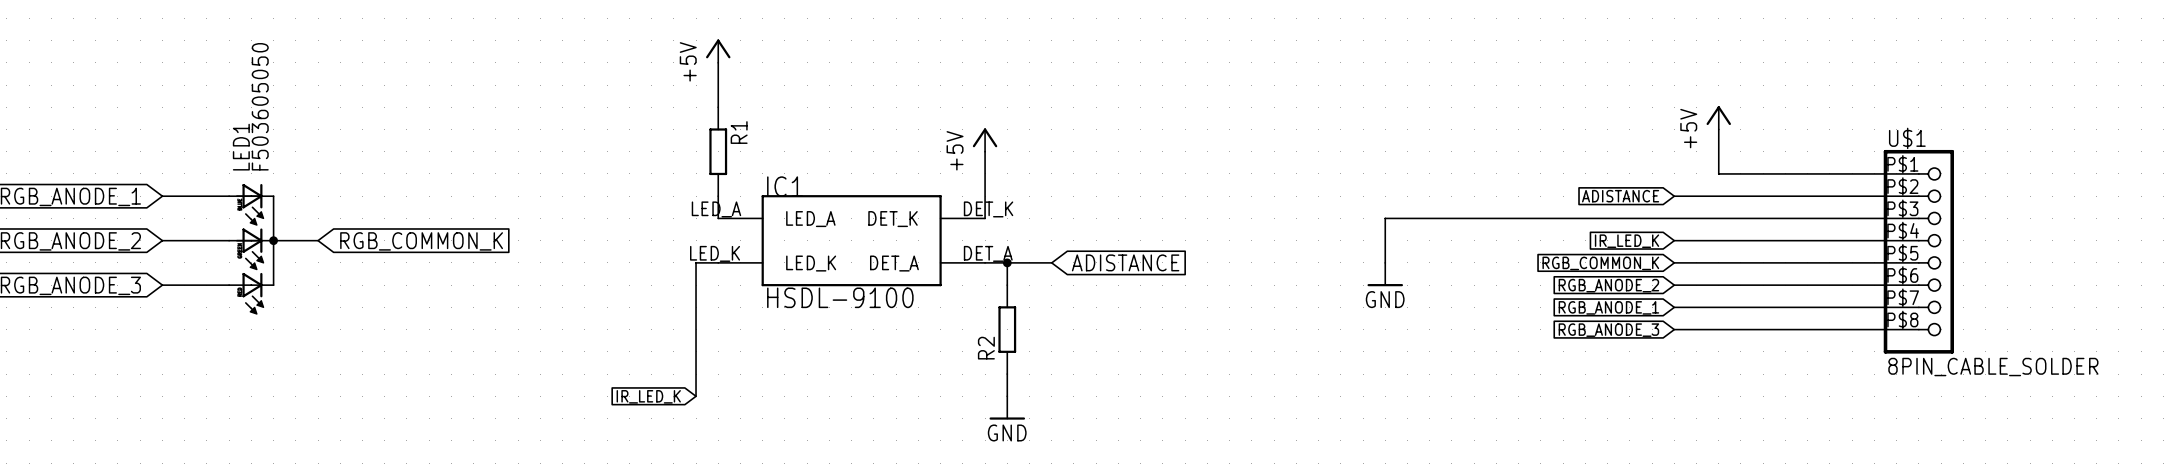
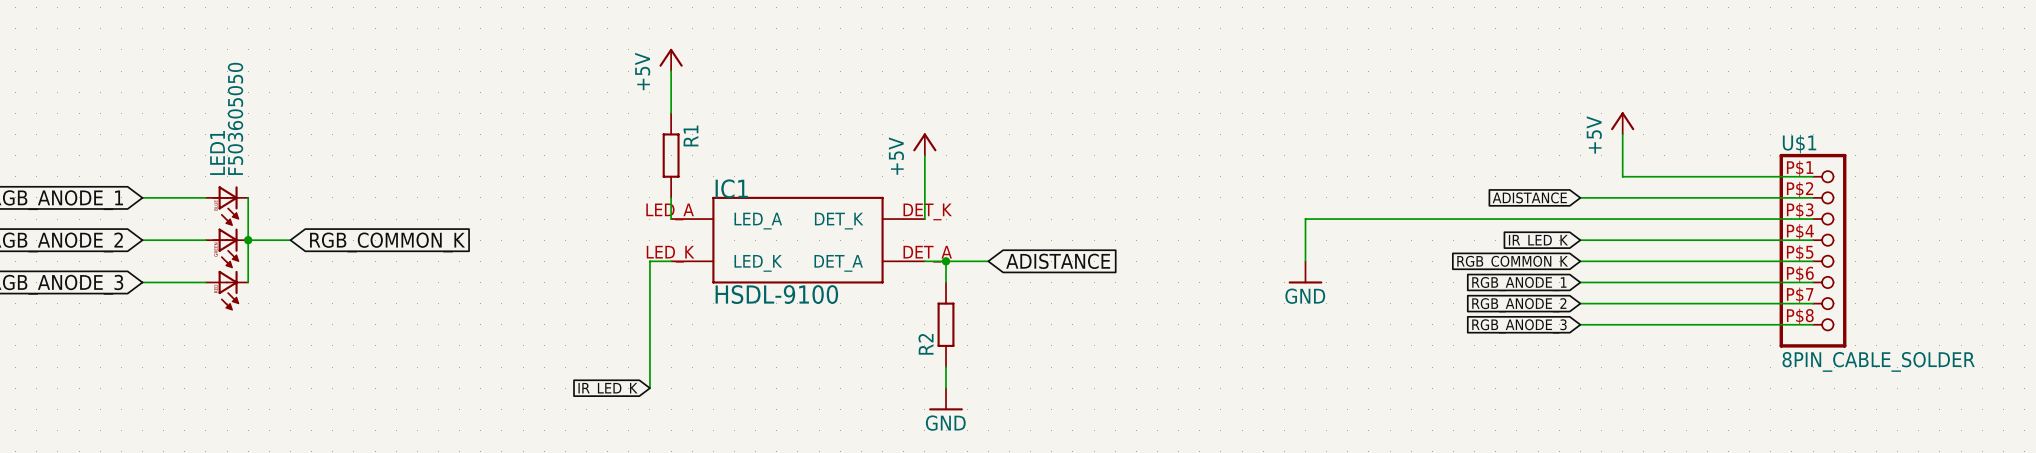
global label: RGB_ANODE_2 (1608, 285) -> RGB_ANODE_1 (1519, 284)
global label: RGB_ANODE_1 (1608, 307) -> RGB_ANODE_2 (1519, 305)

